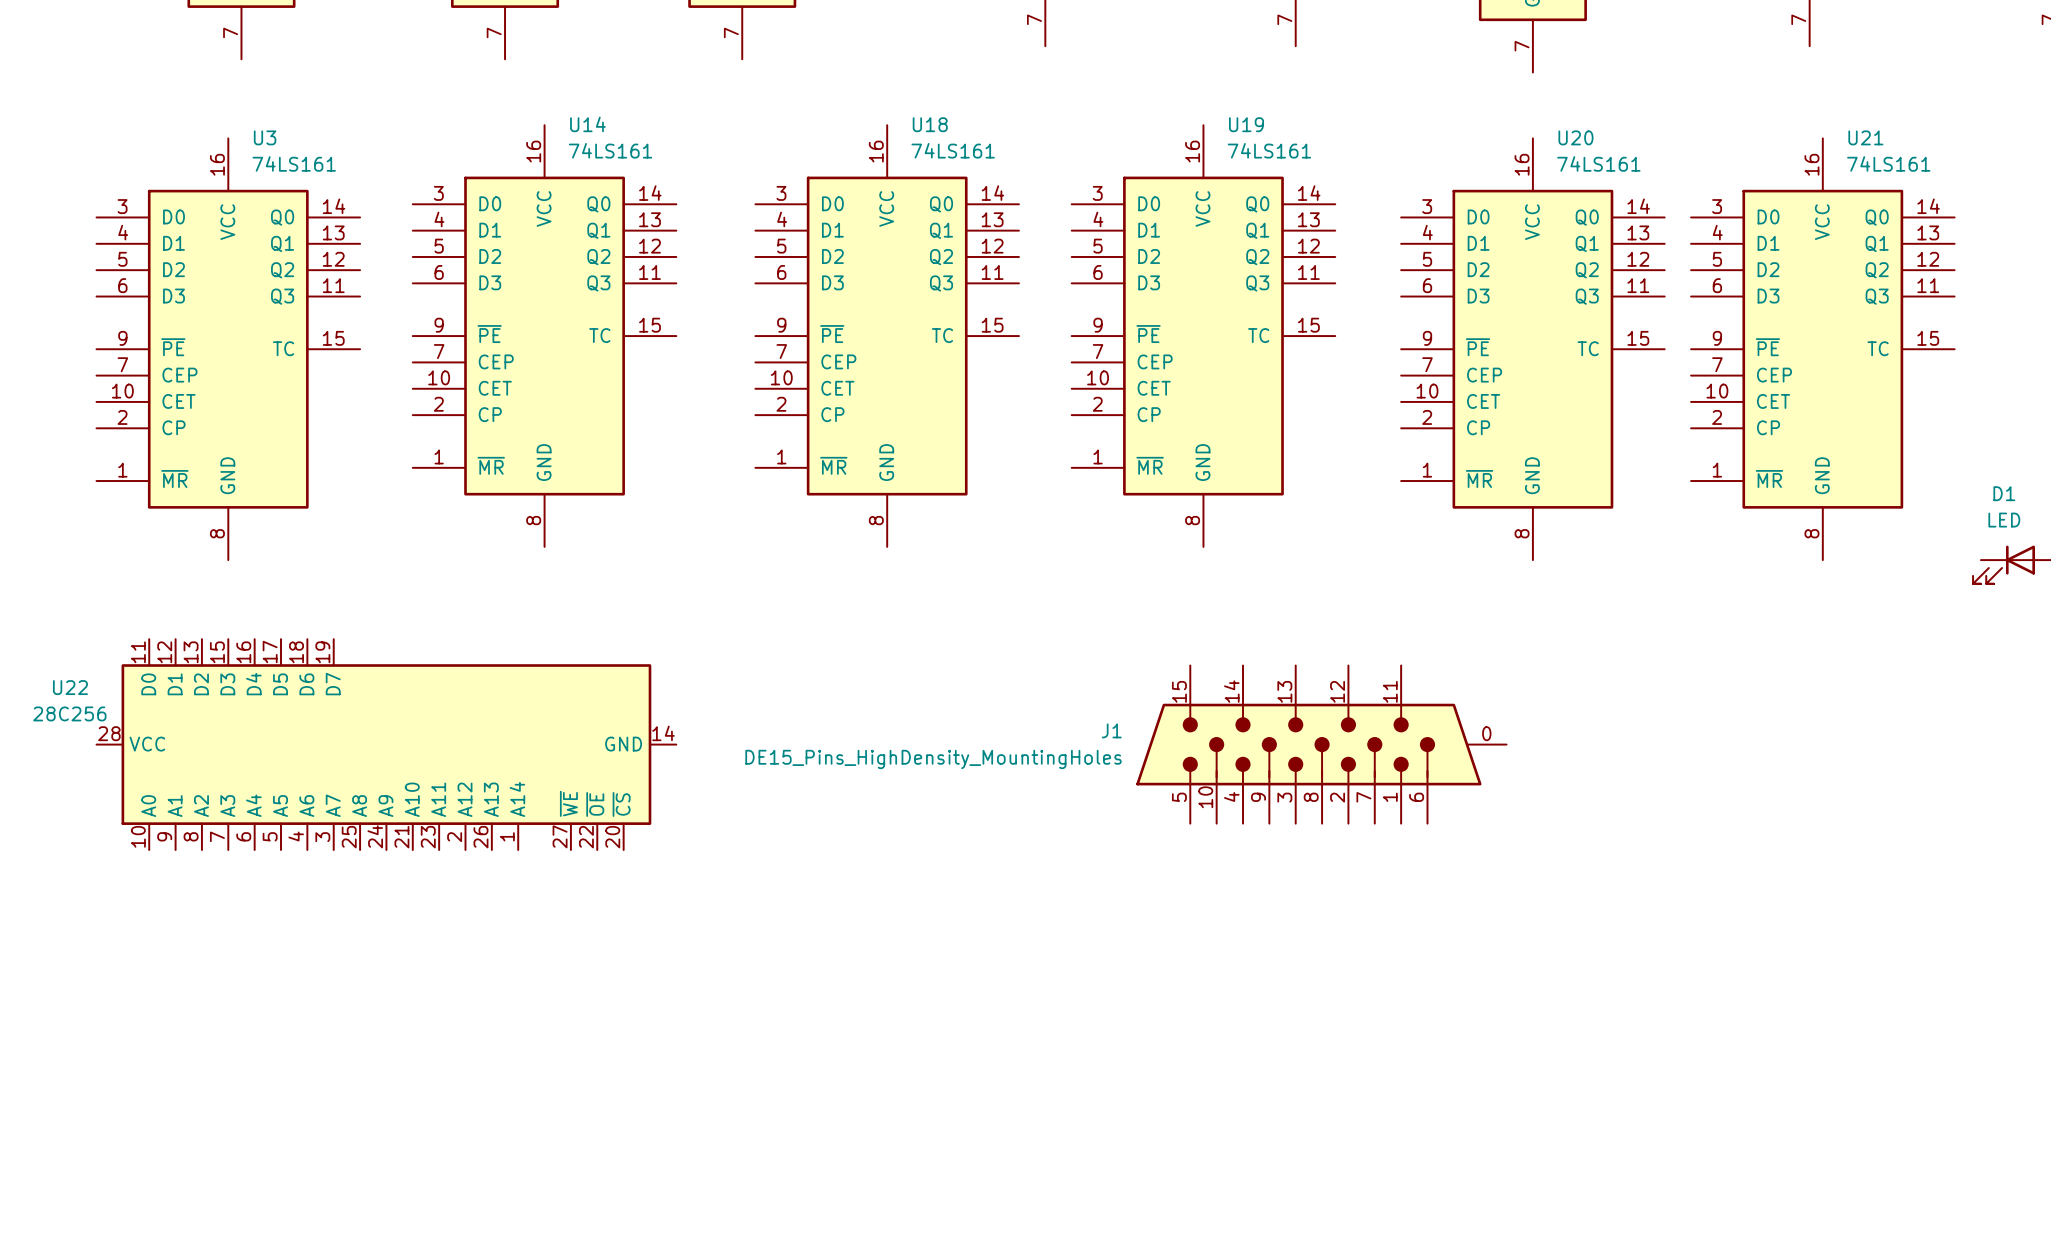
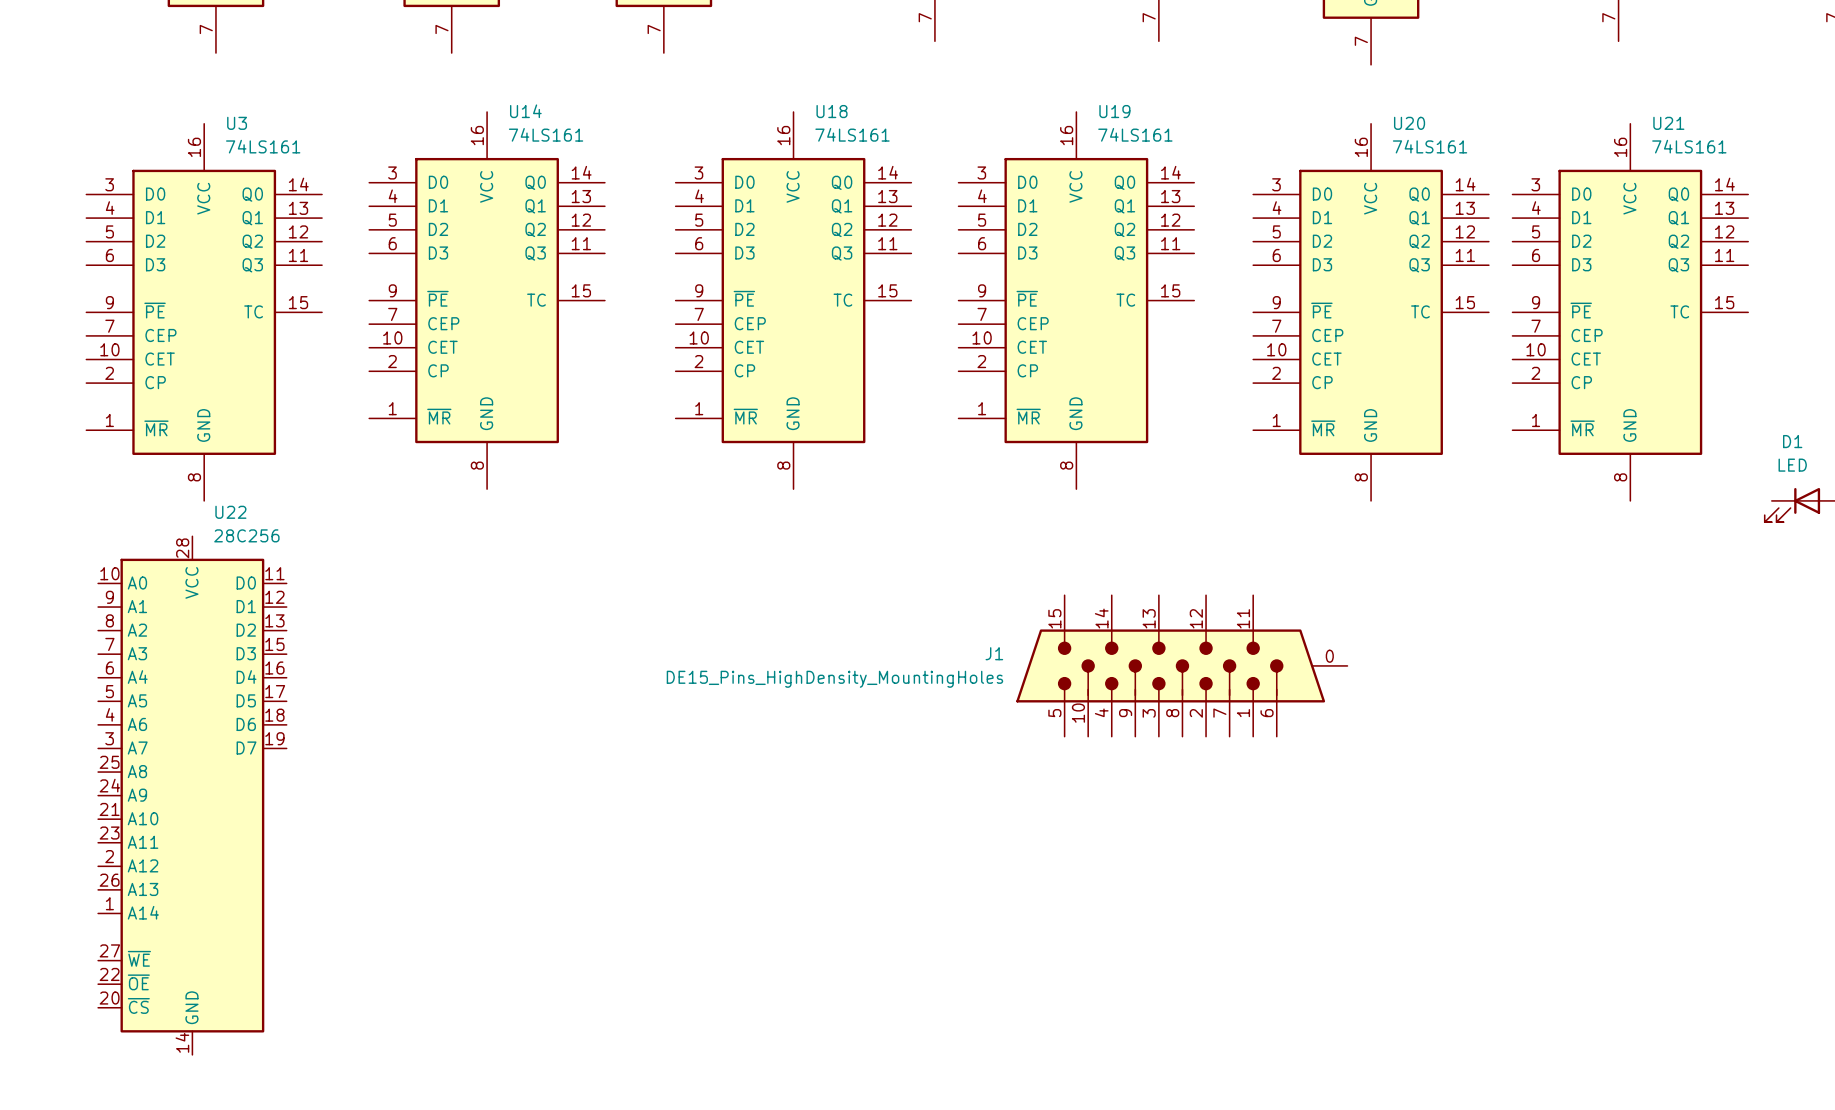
U22 value position: 28C256 (69, 713) -> 28C256 (246, 535)
U22 rotation: 0° (386, 744) -> 90° clockwise (192, 795)

